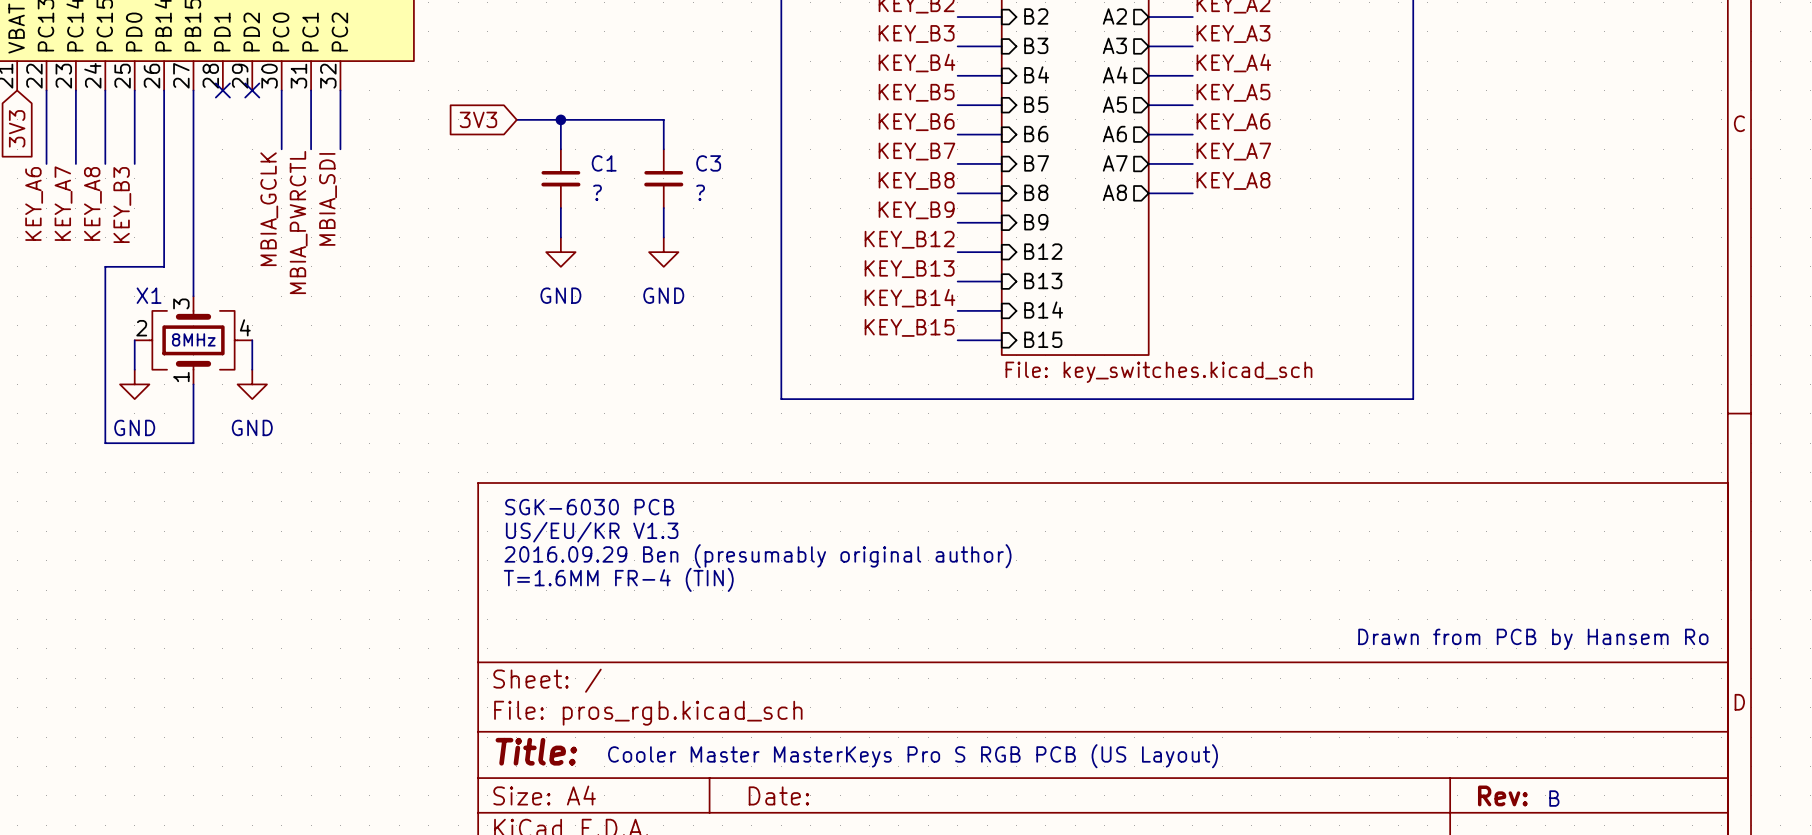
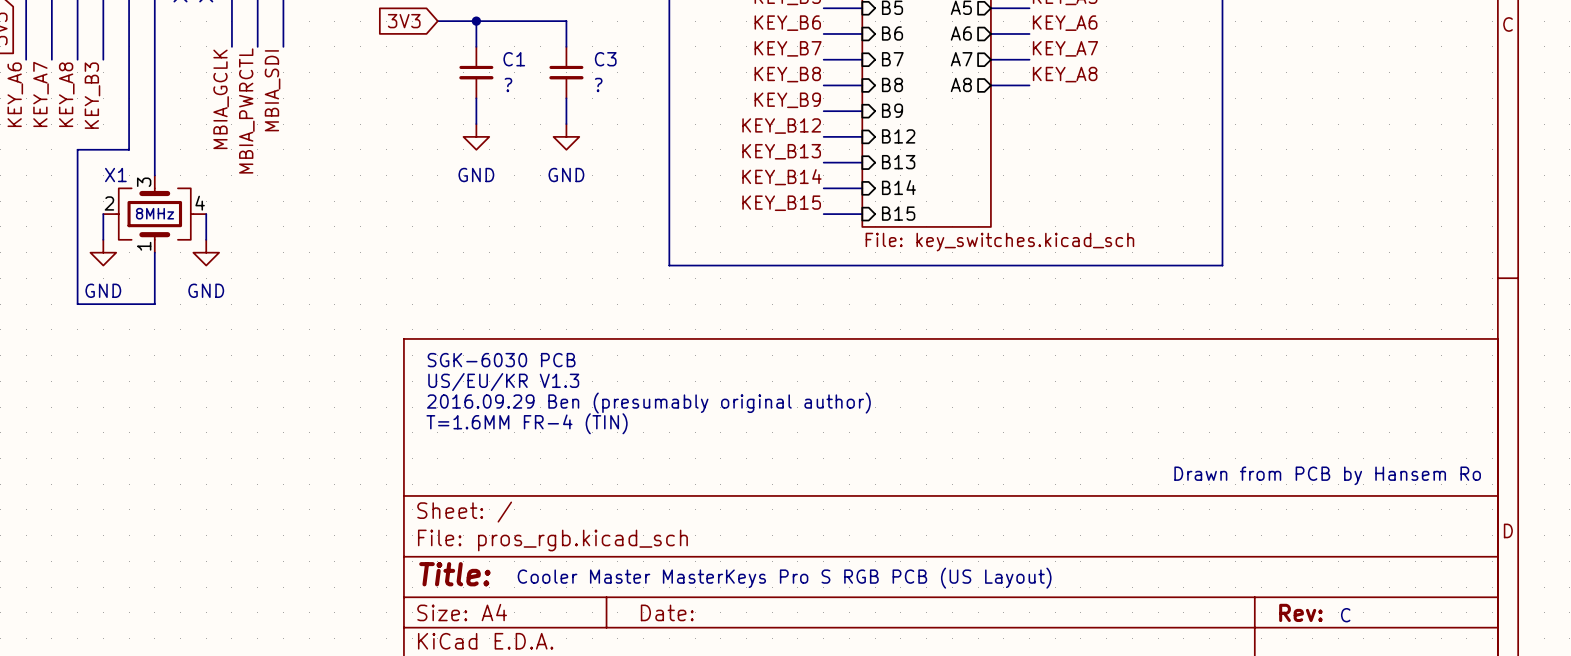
text: B (1554, 798) -> C (1345, 615)

